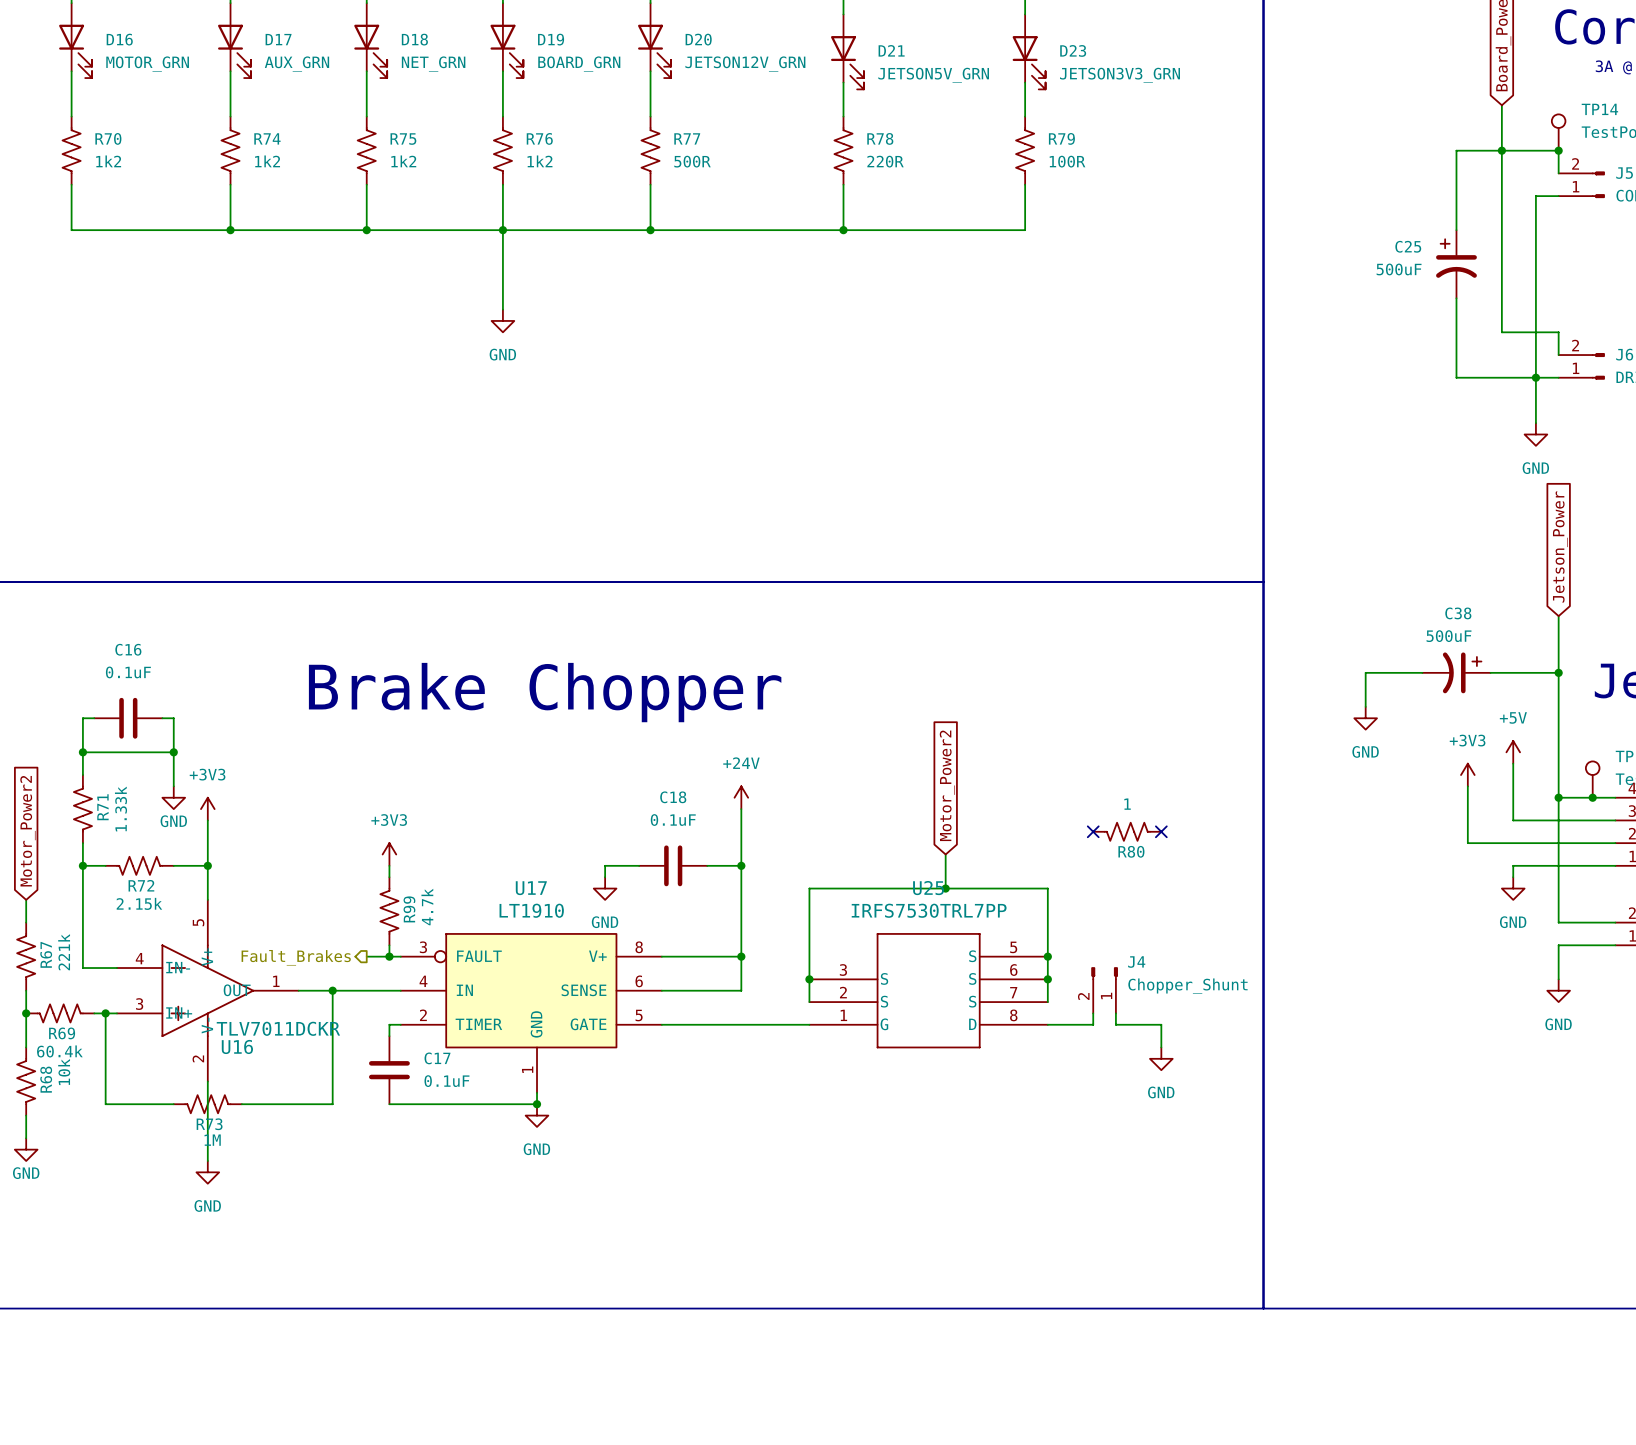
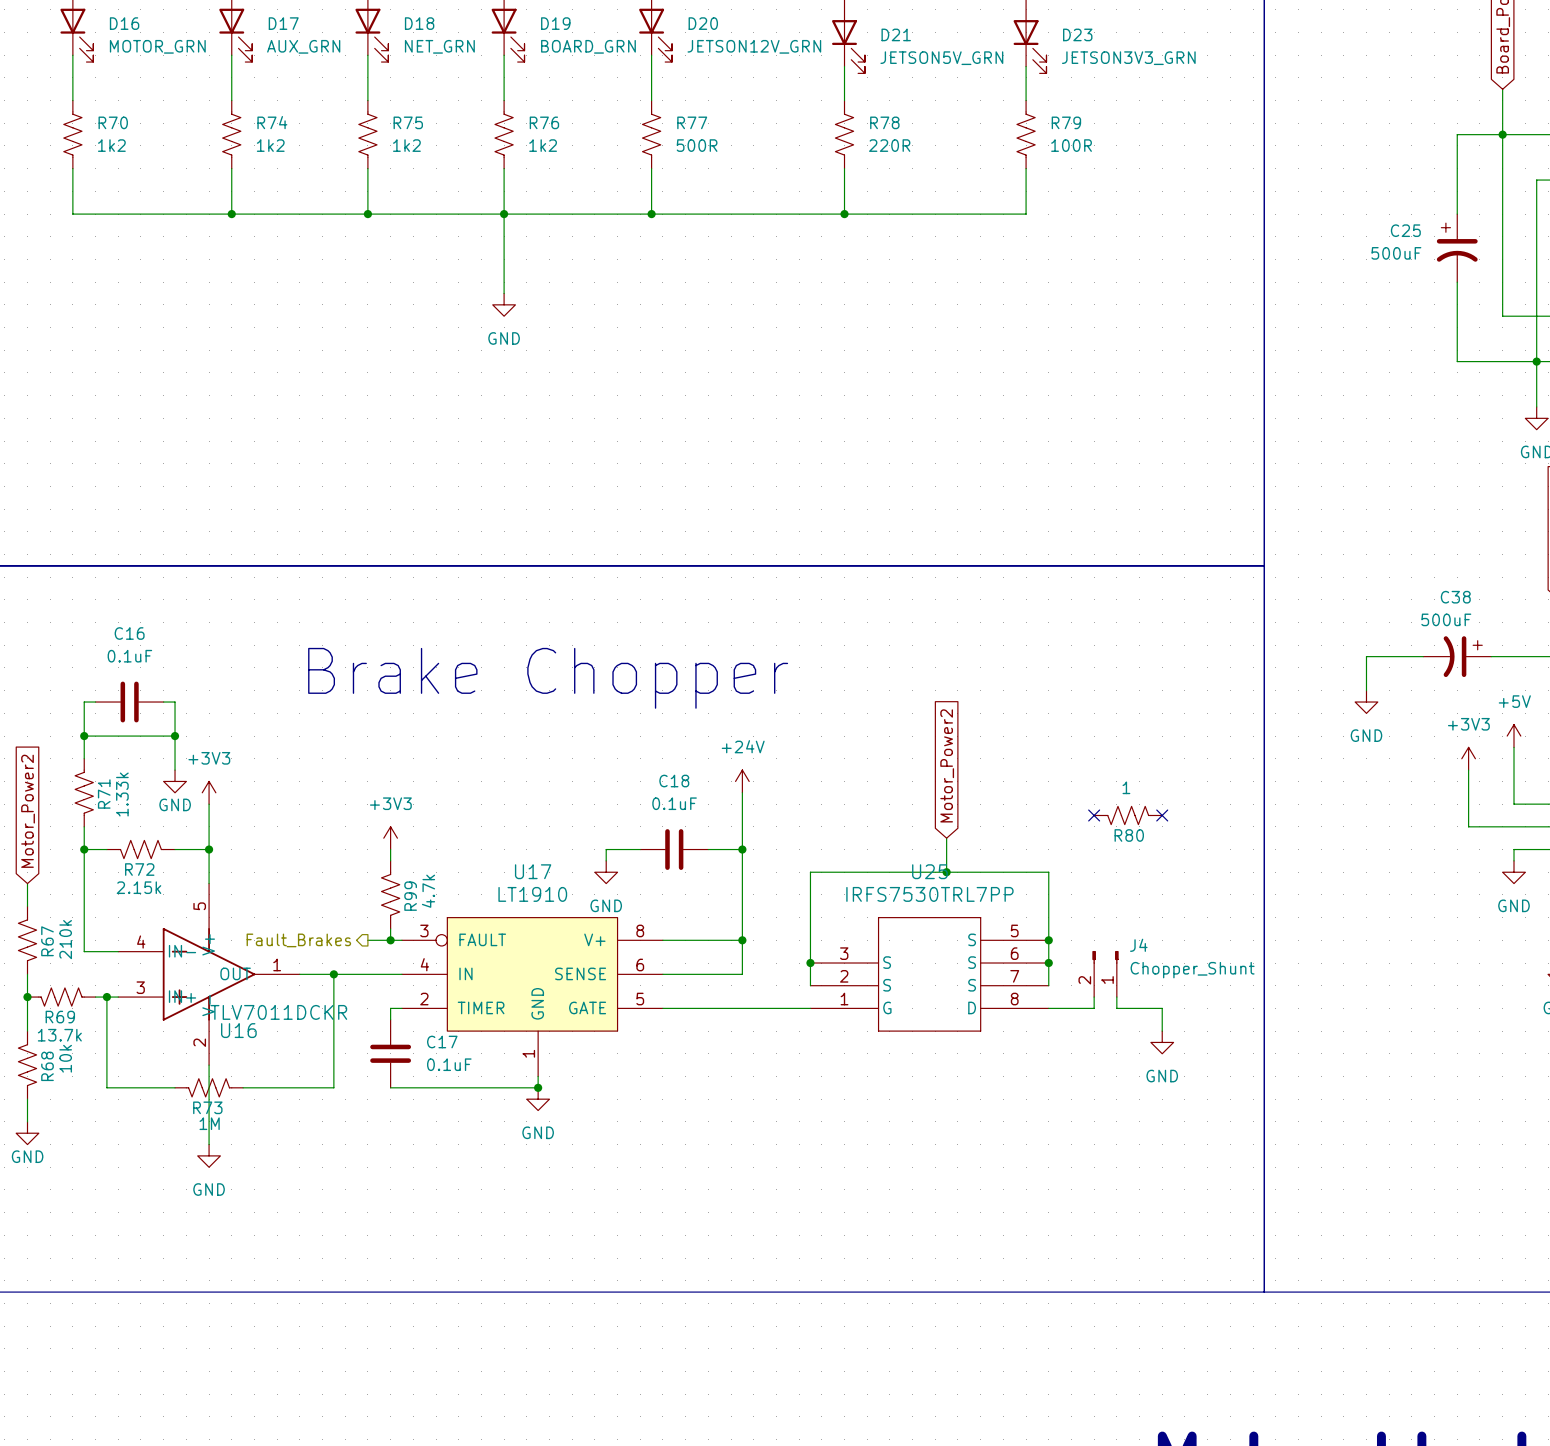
R67 value: 221k (64, 952) -> 210k (65, 939)
R69 value: 60.4k (59, 1051) -> 13.7k (59, 1035)

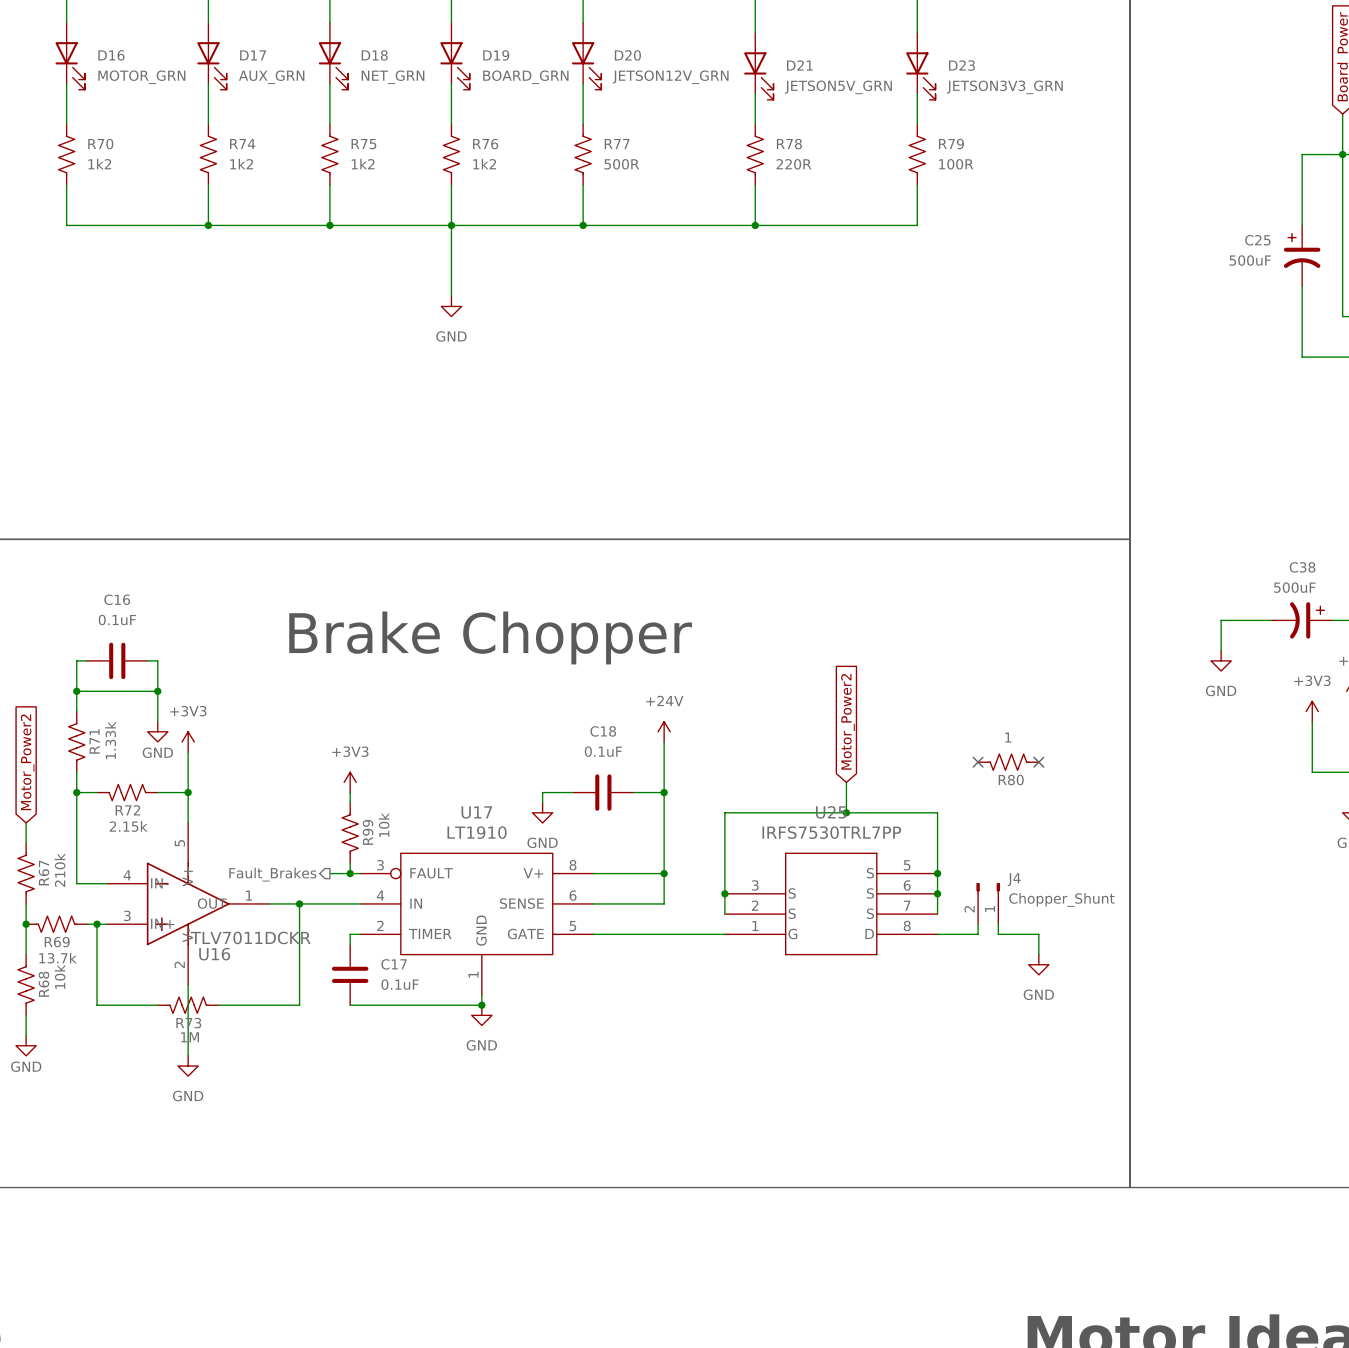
R99 value: 4.7k (428, 891) -> 10k (384, 824)

